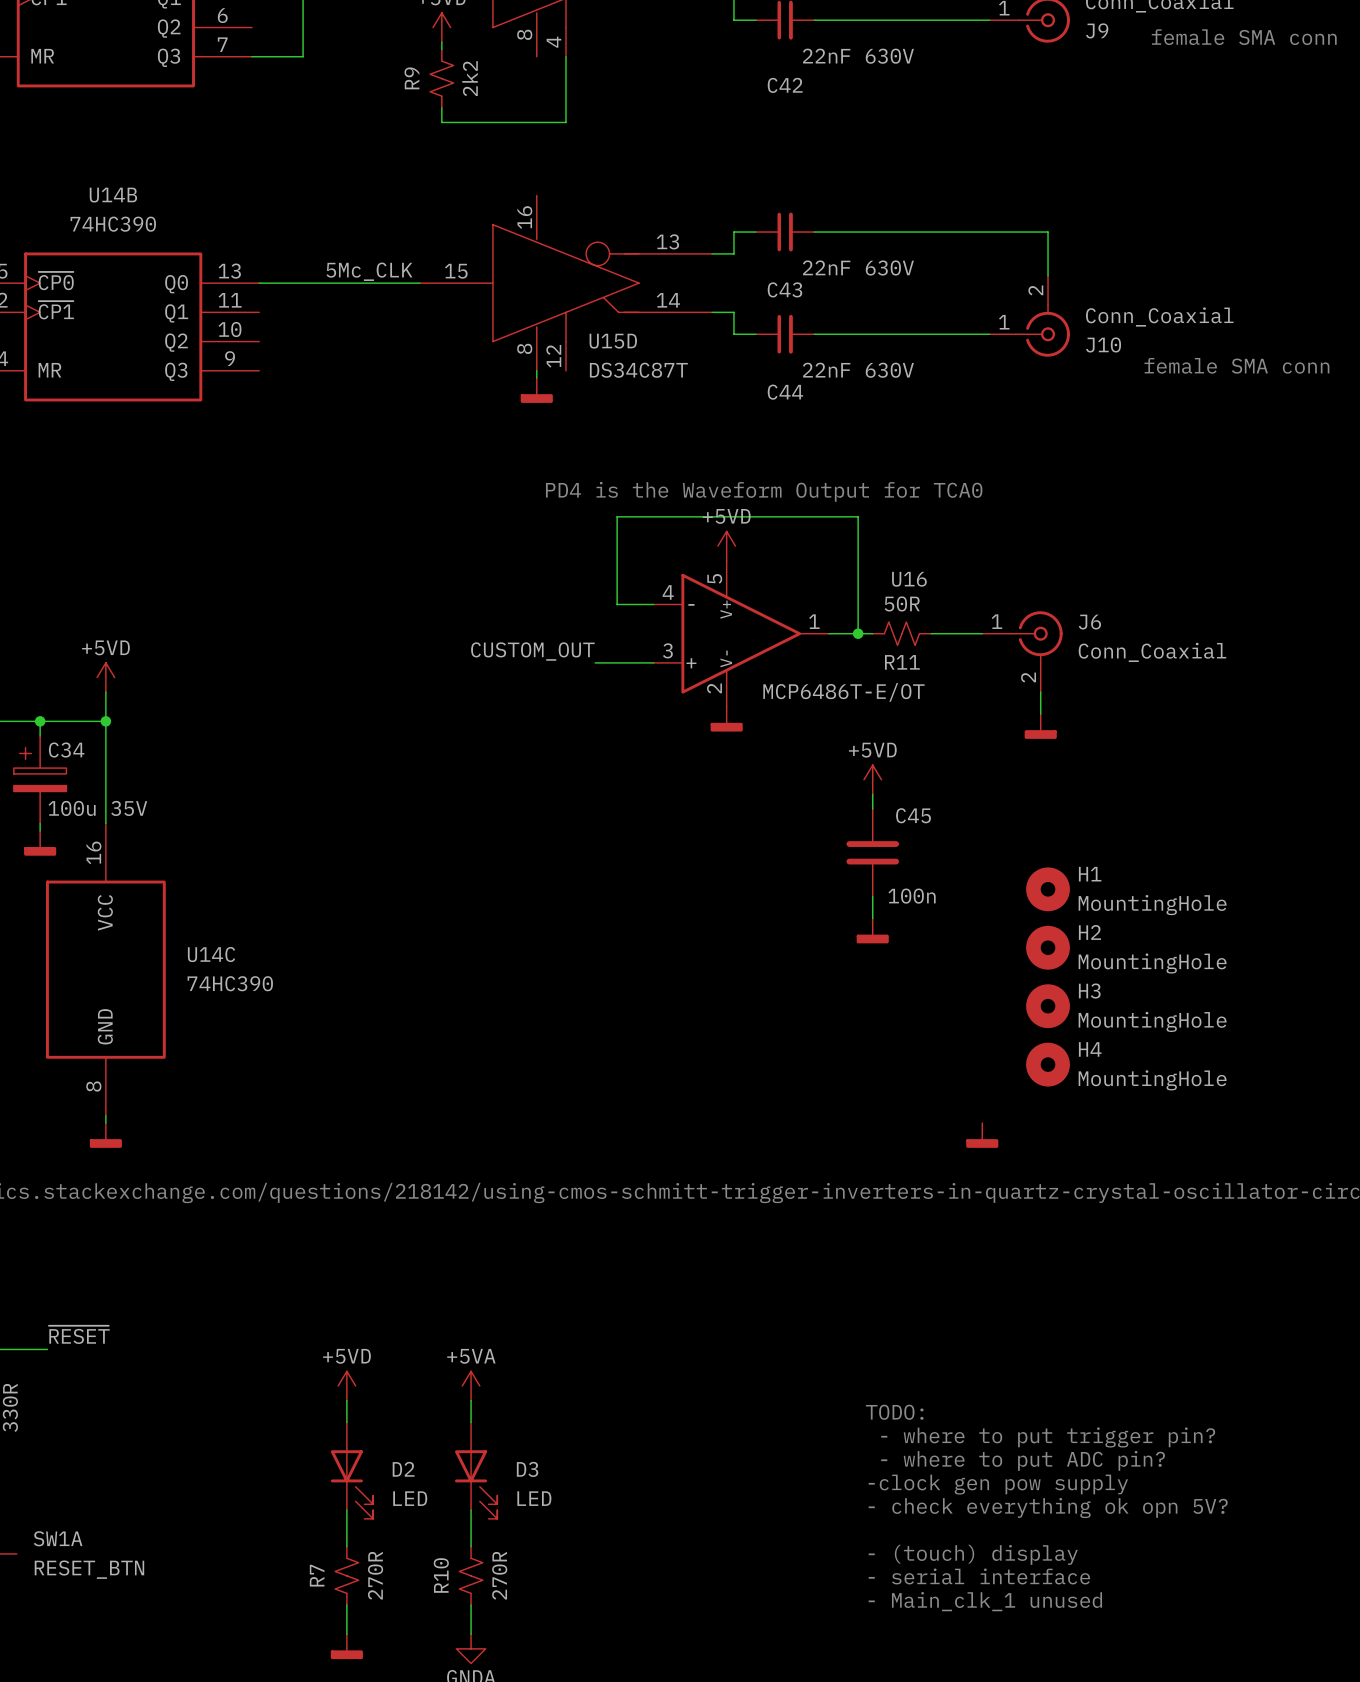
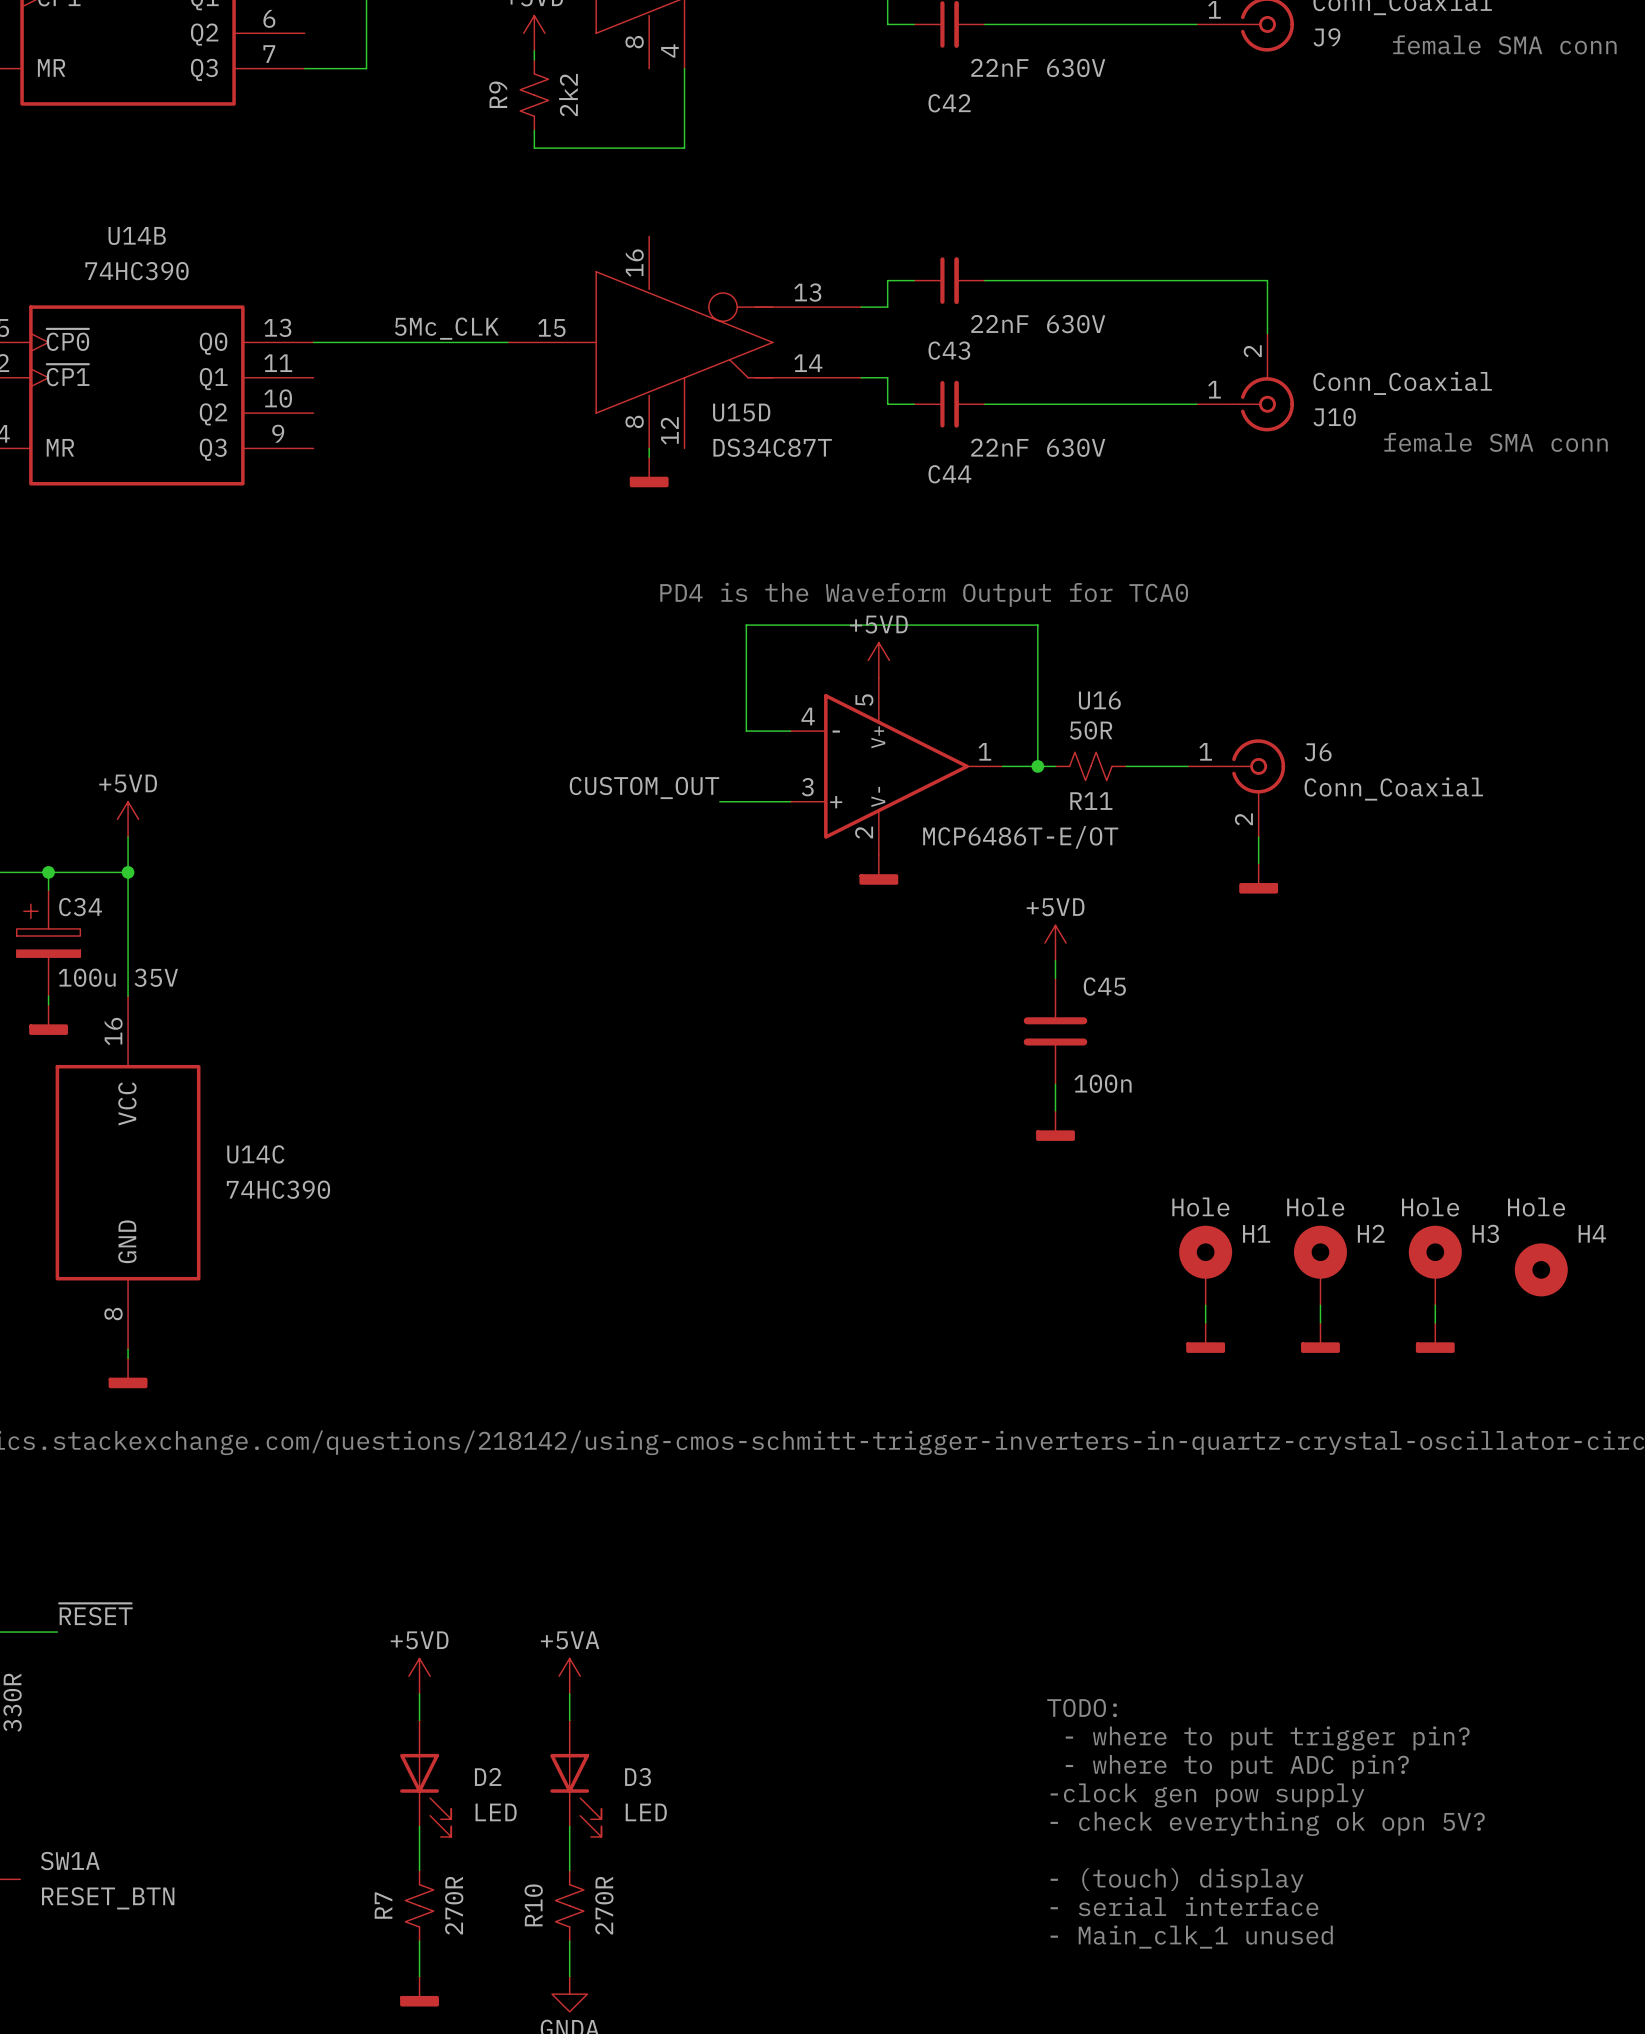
H1 symbol: [1026, 867, 1070, 912] -> [1179, 1225, 1233, 1306]
H1 value: MountingHole (1152, 905) -> Hole (1200, 1207)
H2 symbol: [1026, 925, 1070, 970] -> [1293, 1225, 1347, 1306]
H2 value: MountingHole (1152, 963) -> Hole (1315, 1207)
H3 symbol: [1026, 984, 1070, 1029] -> [1408, 1225, 1462, 1306]
H3 value: MountingHole (1152, 1021) -> Hole (1430, 1207)
H4 name position: H4 (1090, 1049) -> H4 (1592, 1233)
H4 position: (1048, 1064) -> (1541, 1269)
wire: none -> (1205, 1305) (1205, 1322)
wire: none -> (1320, 1305) (1320, 1322)
wire: none -> (1435, 1305) (1435, 1322)
H4 value: MountingHole (1152, 1080) -> Hole (1536, 1207)
power symbol: none -> (1320, 1337)
power symbol: none -> (1435, 1337)
power symbol position: (982, 1135) -> (1205, 1337)

